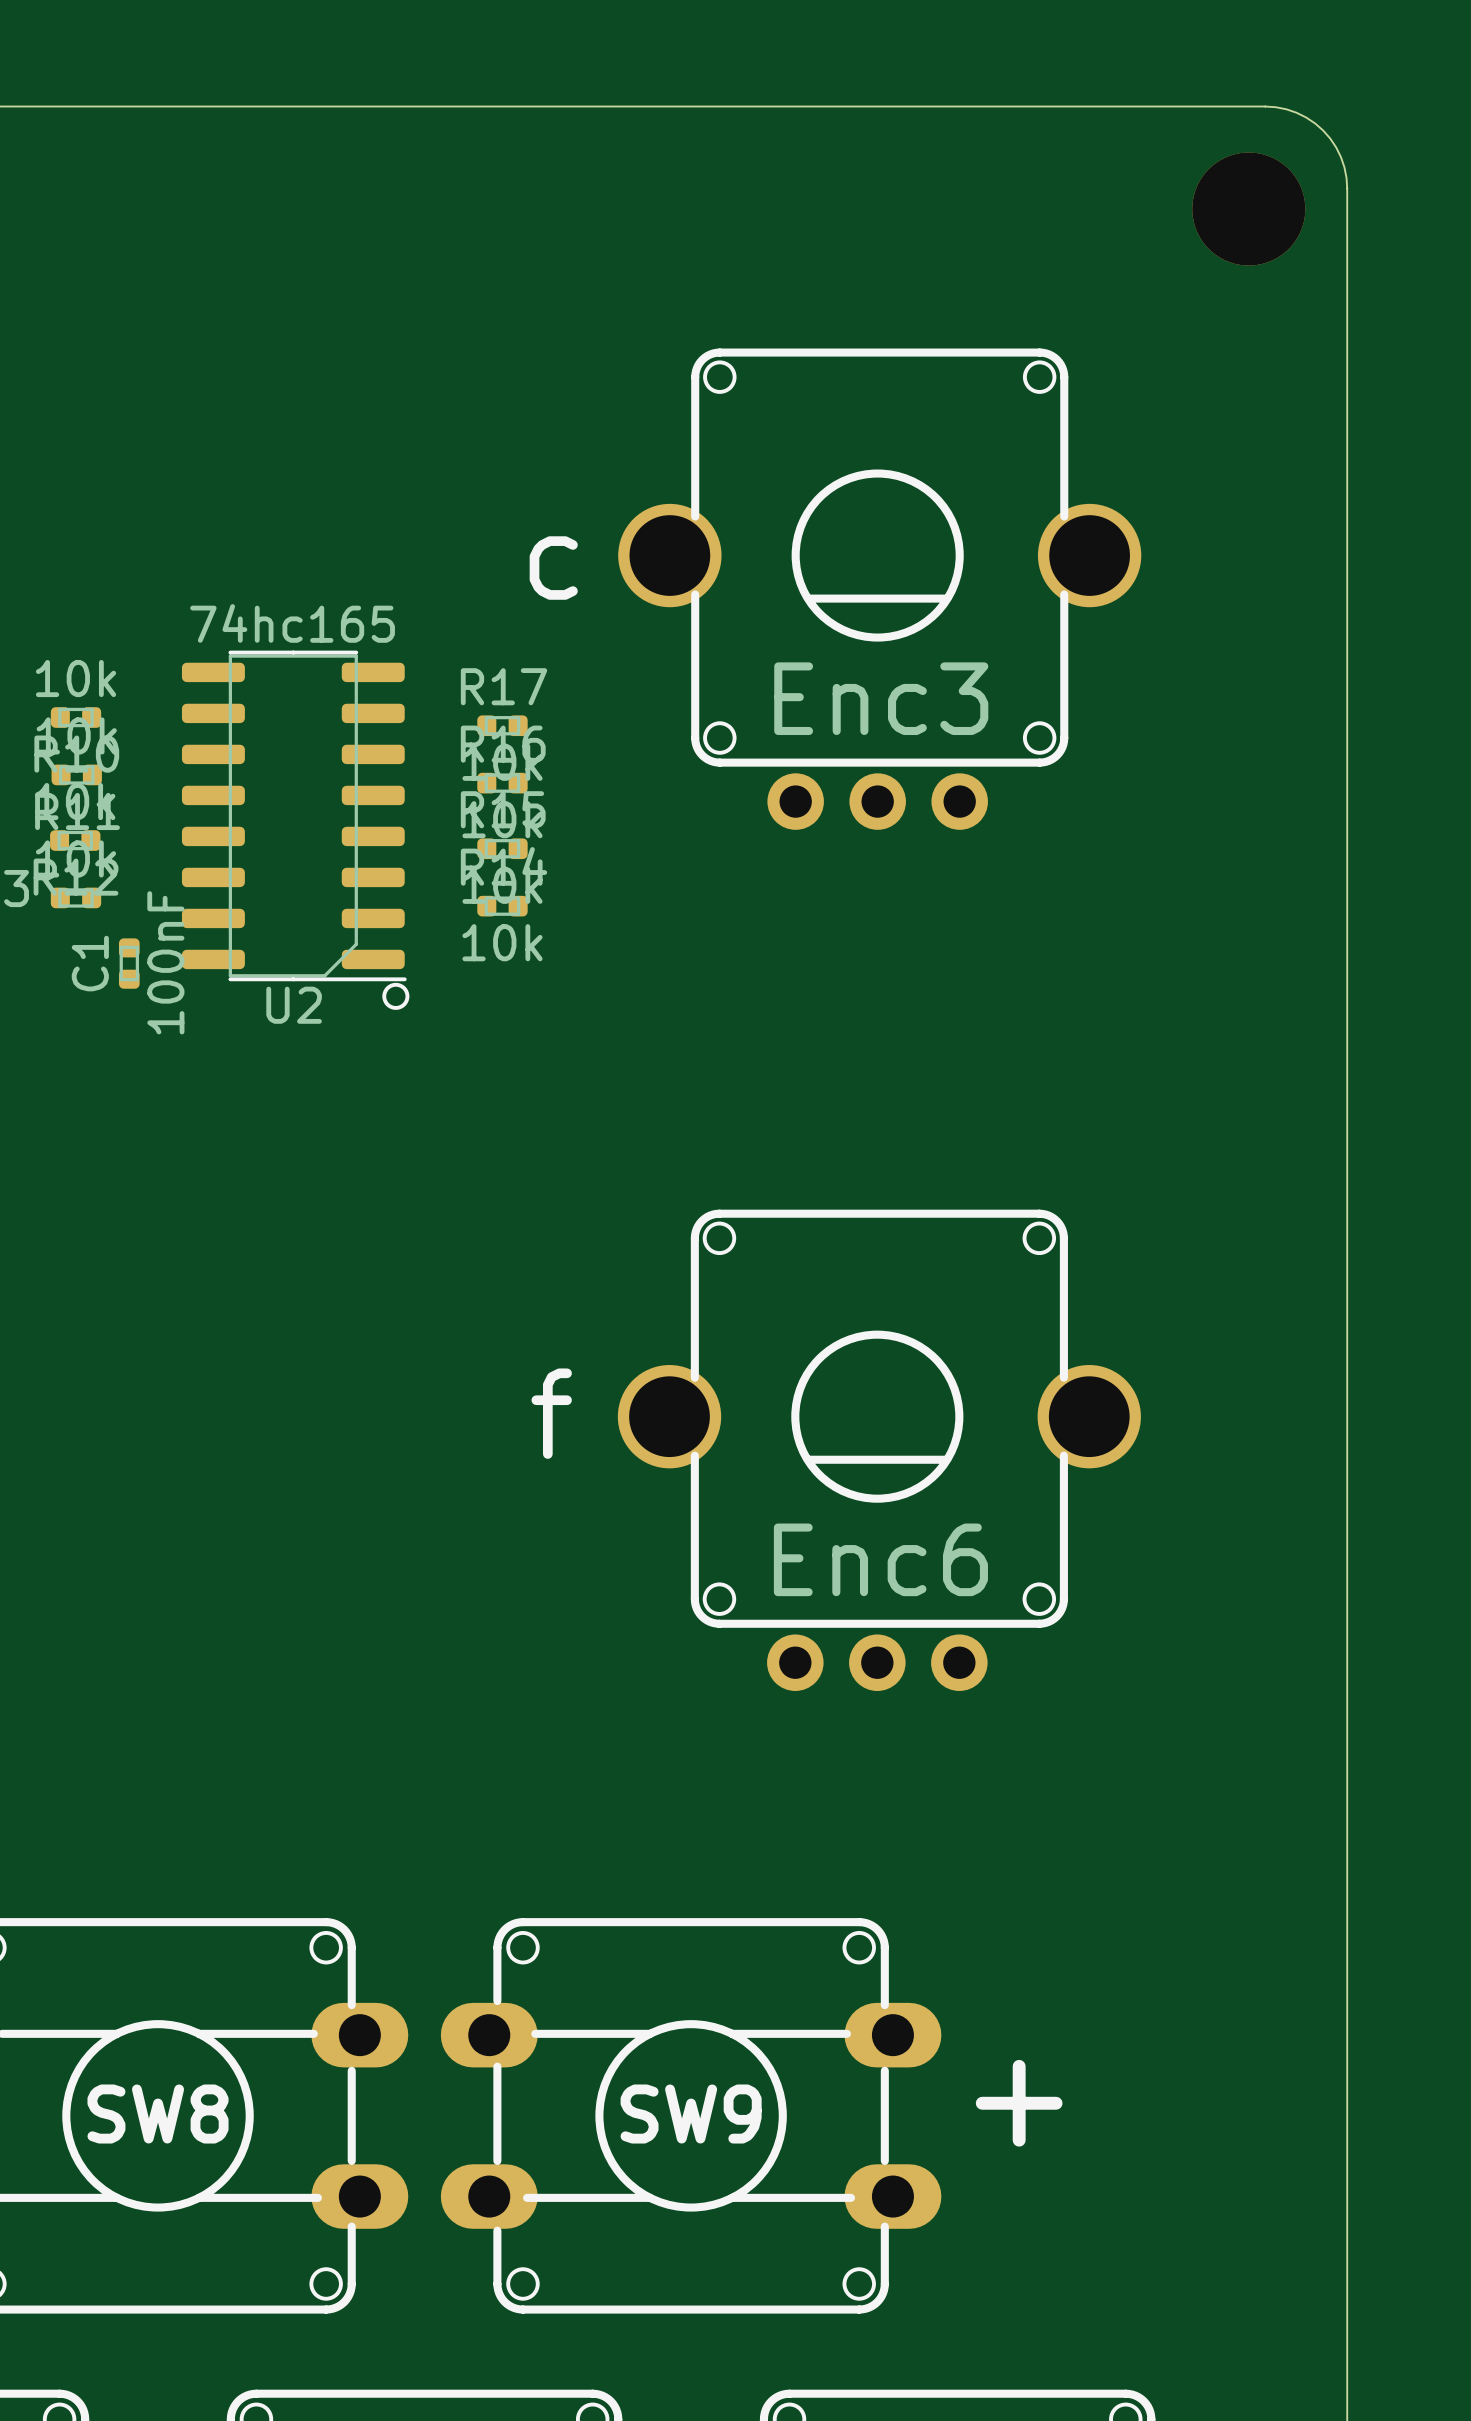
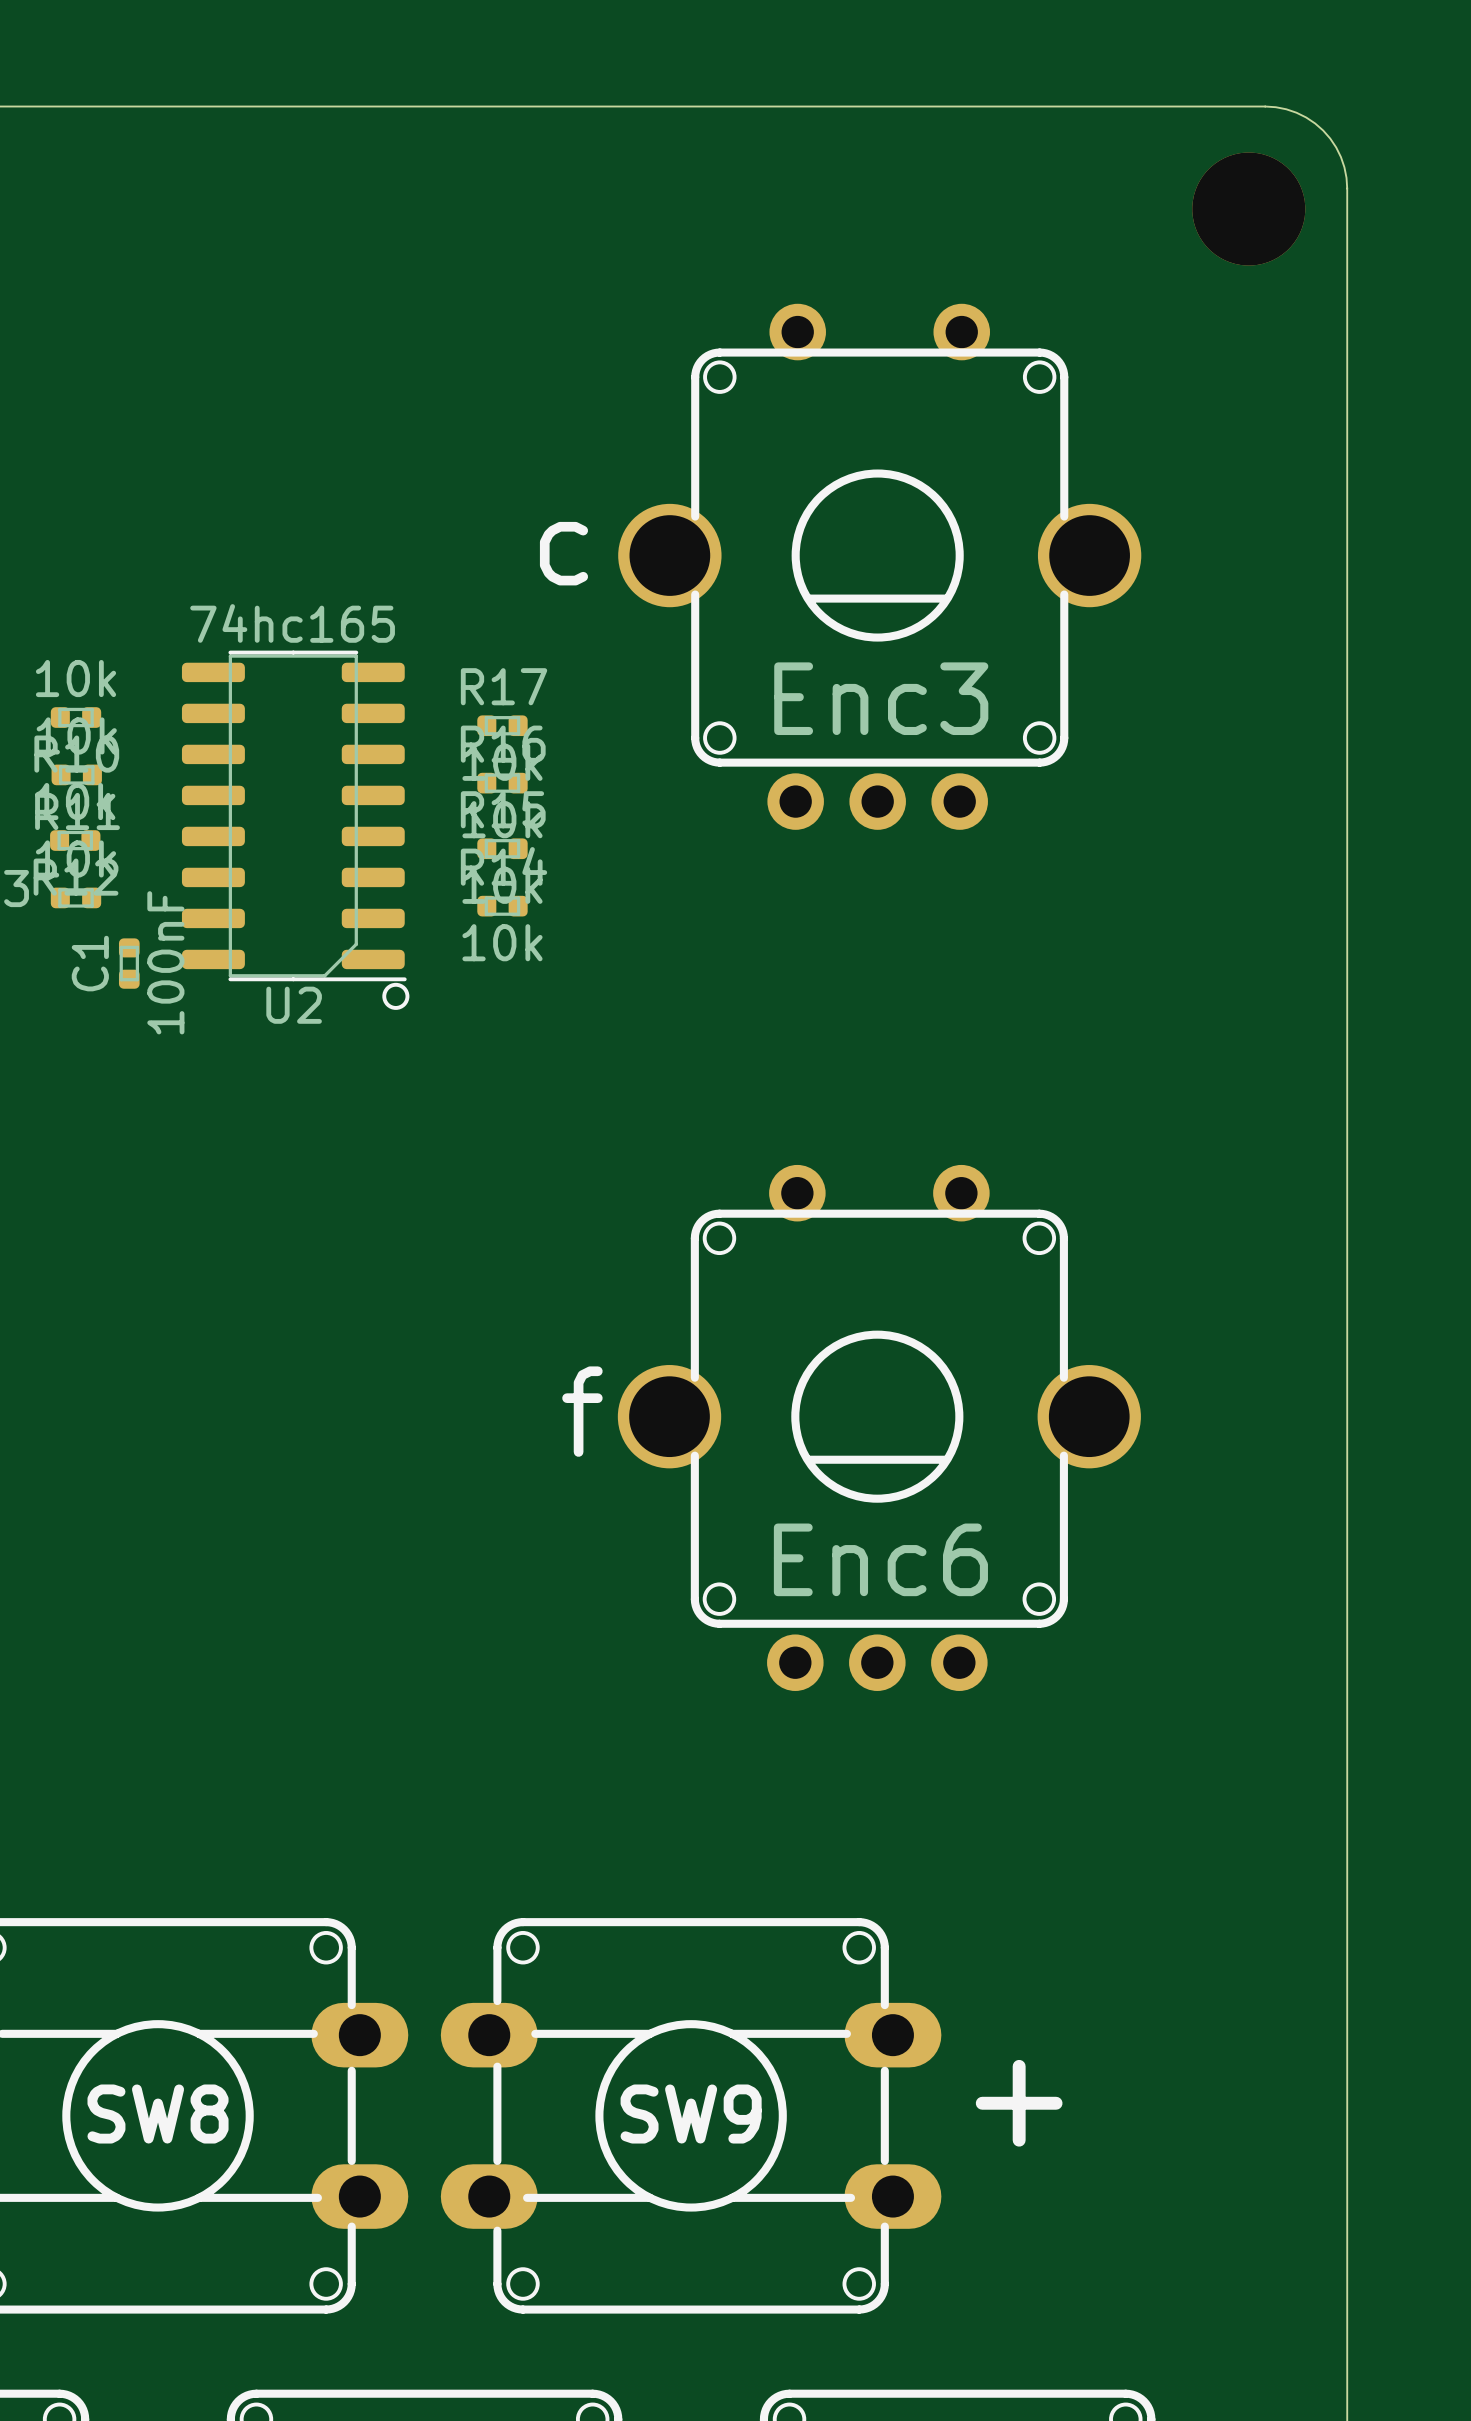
Enc3 footprint: [618, 348, 1142, 830] -> [618, 303, 1142, 830]
Enc6 footprint: [617, 1209, 1141, 1691] -> [617, 1164, 1141, 1691]

